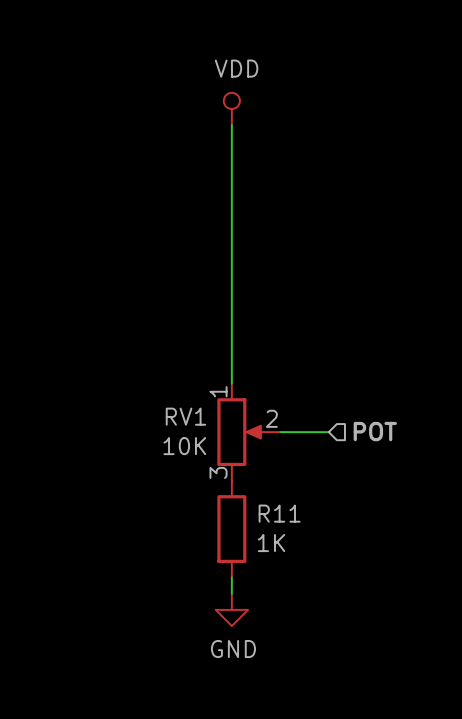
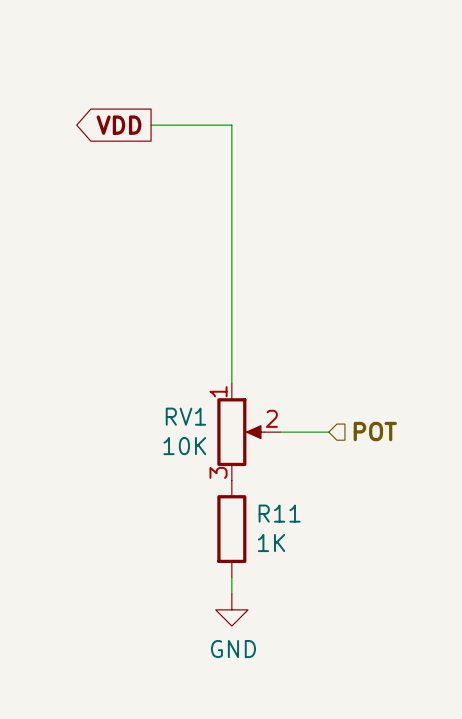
power symbol: VDD (231, 108) -> none
global label: none -> VDD (119, 125)
wire: none -> (151, 125) (231, 125)

